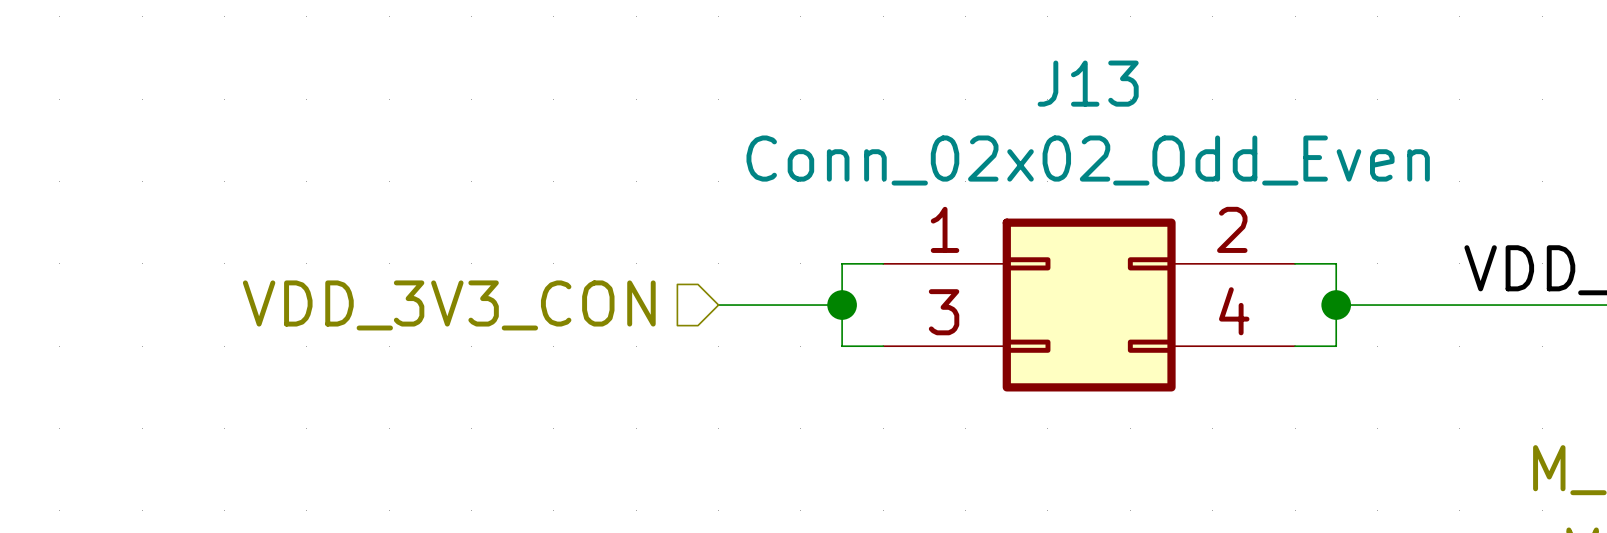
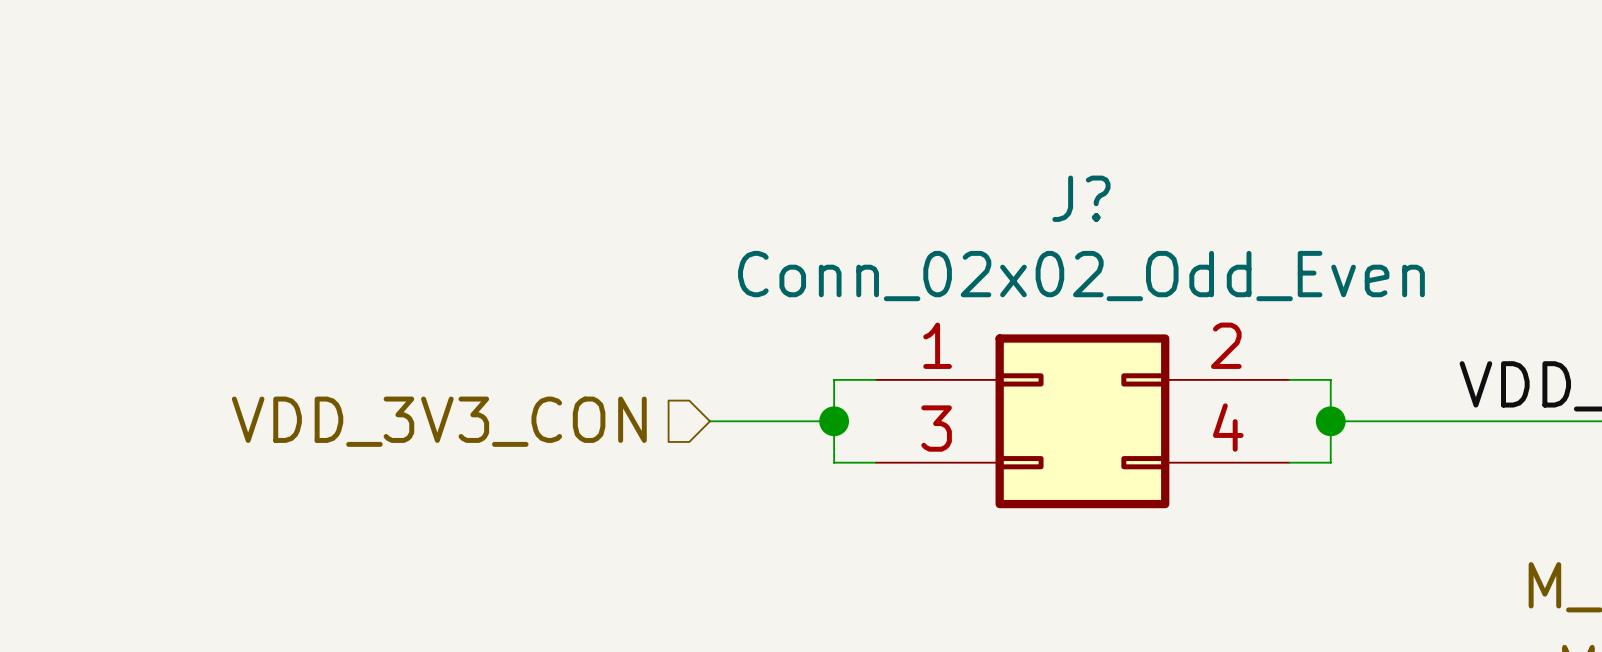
J13 name: J13 (1088, 83) -> J? (1081, 198)

